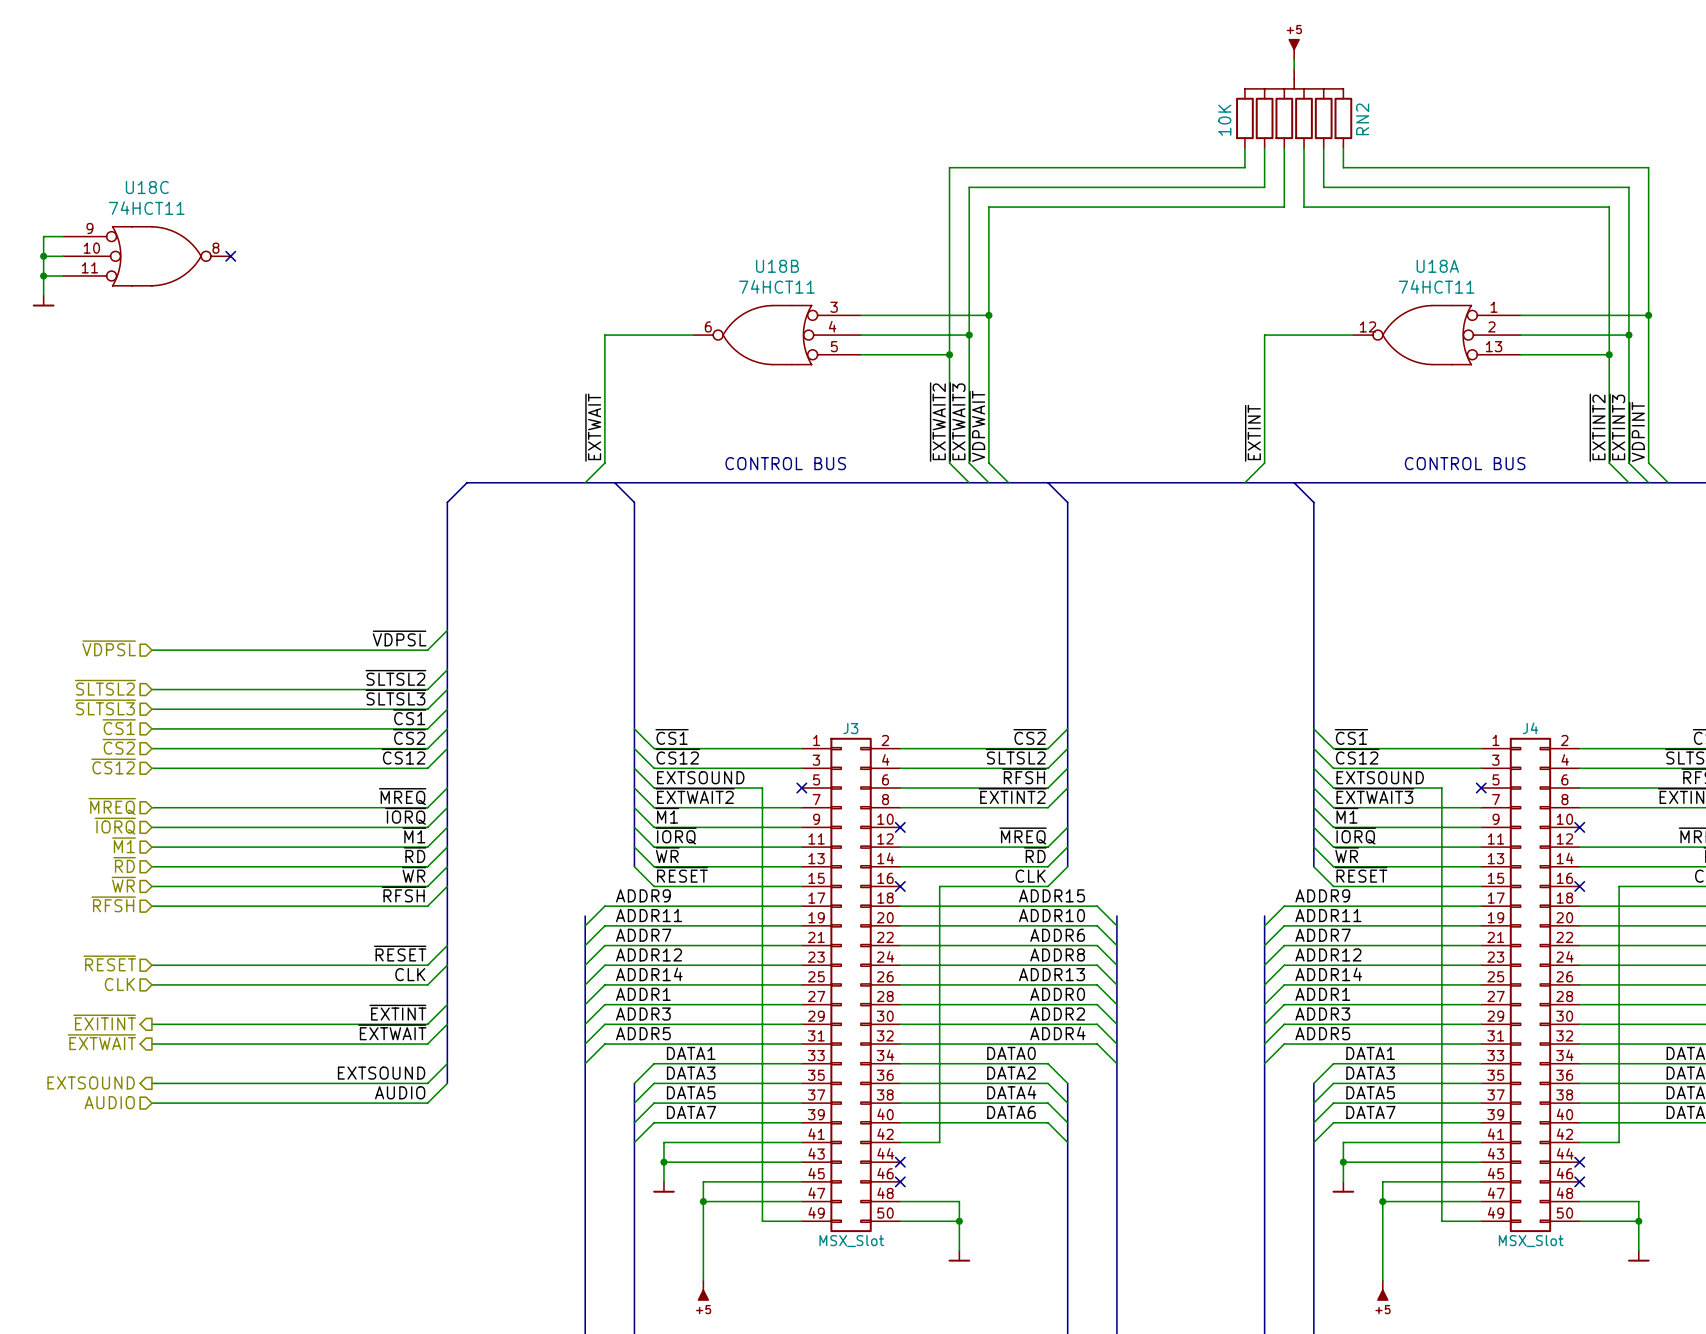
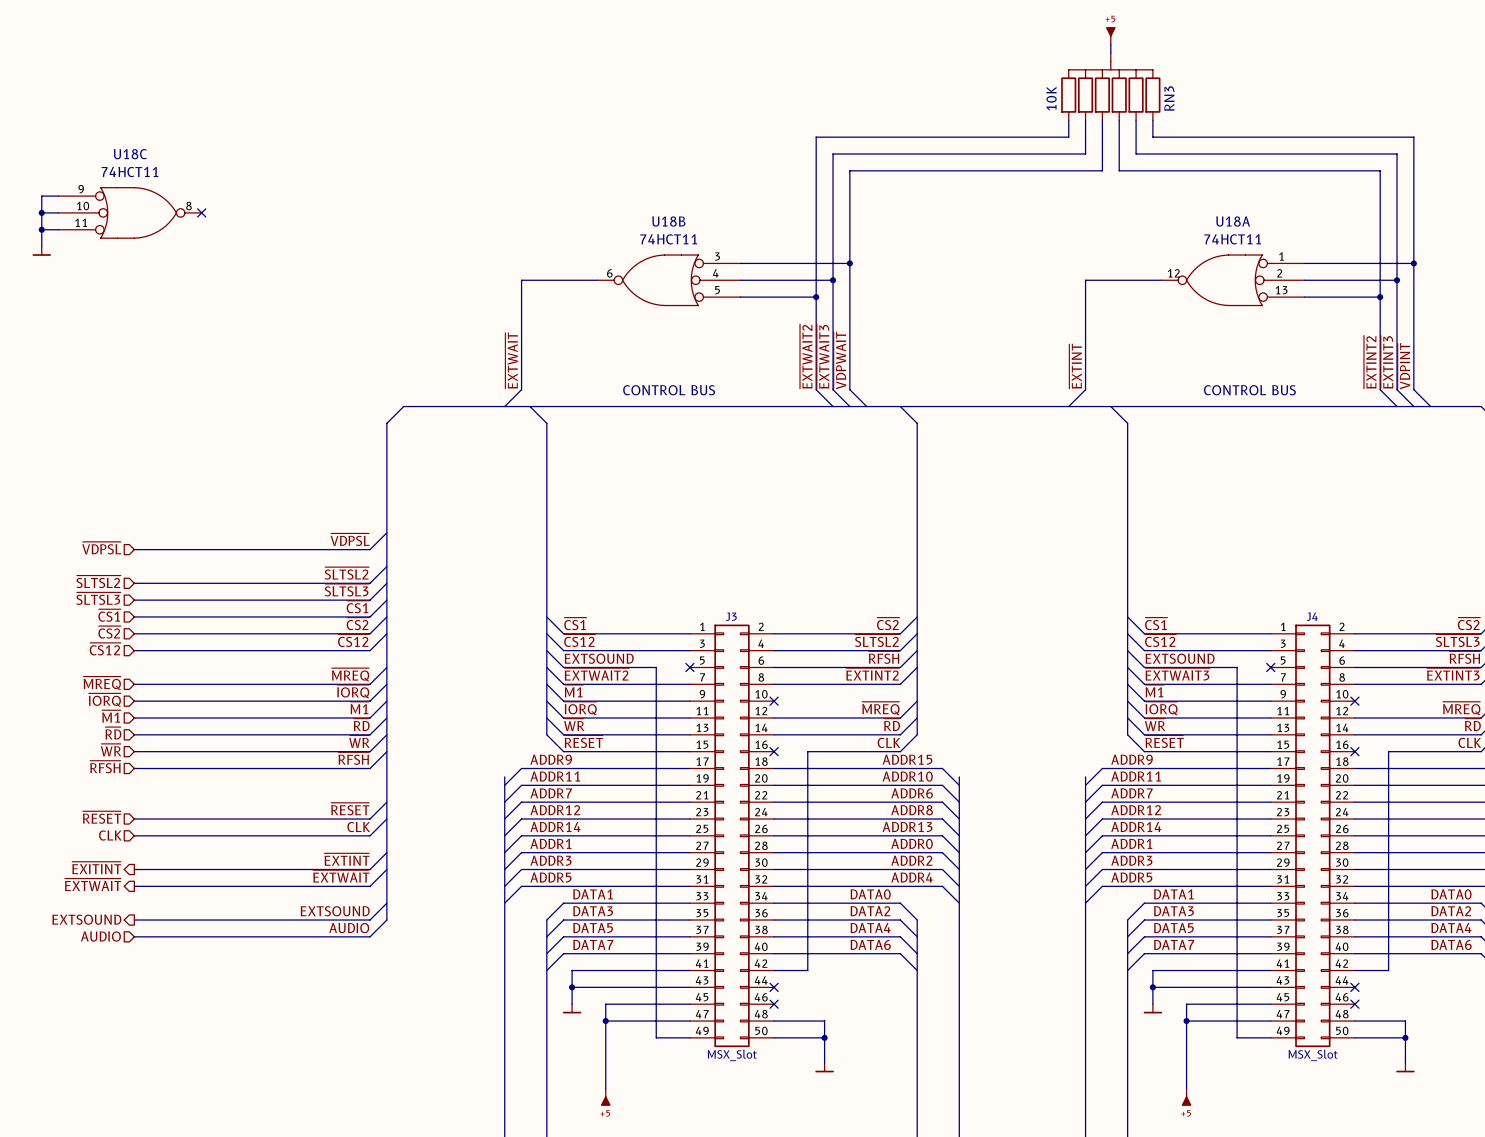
RN2 name: RN2 (1362, 119) -> RN3 (1169, 98)

